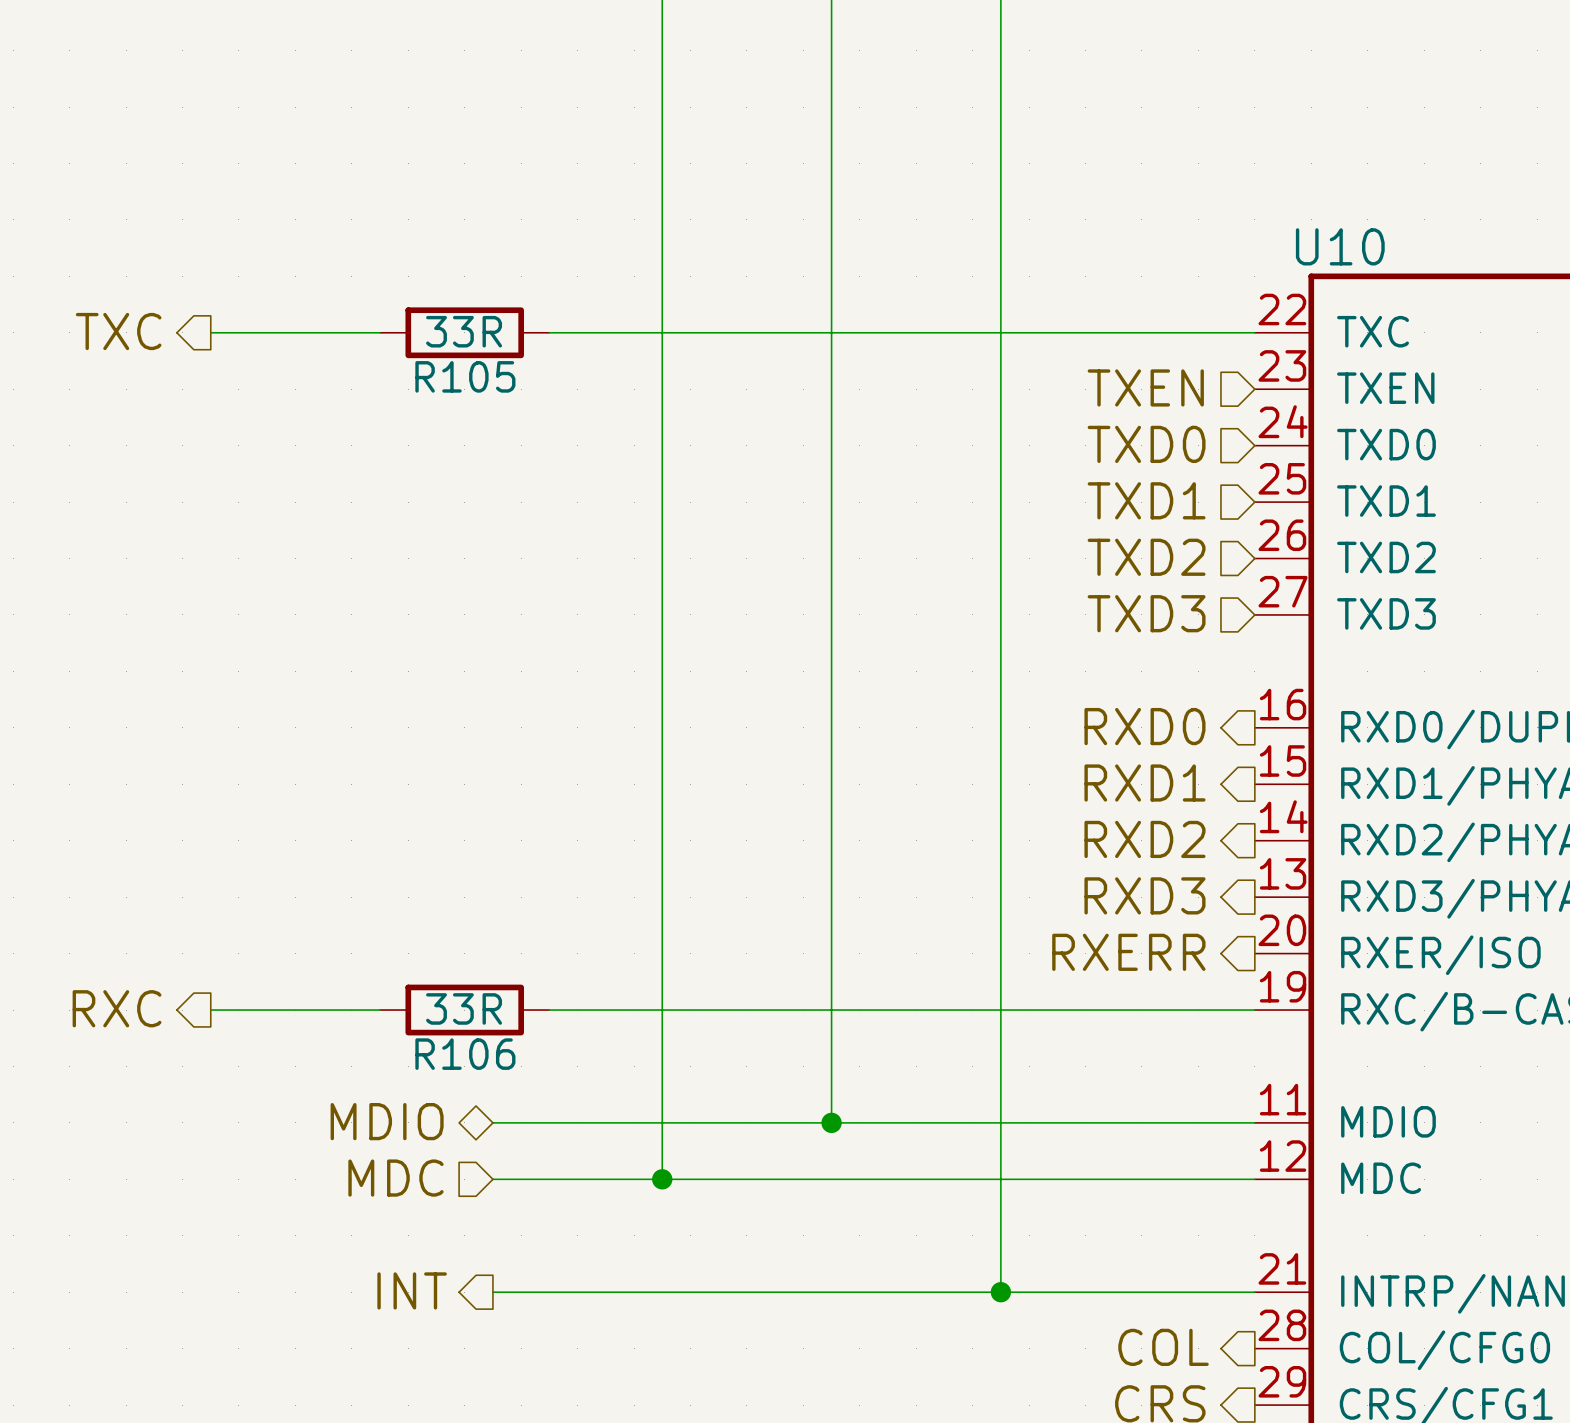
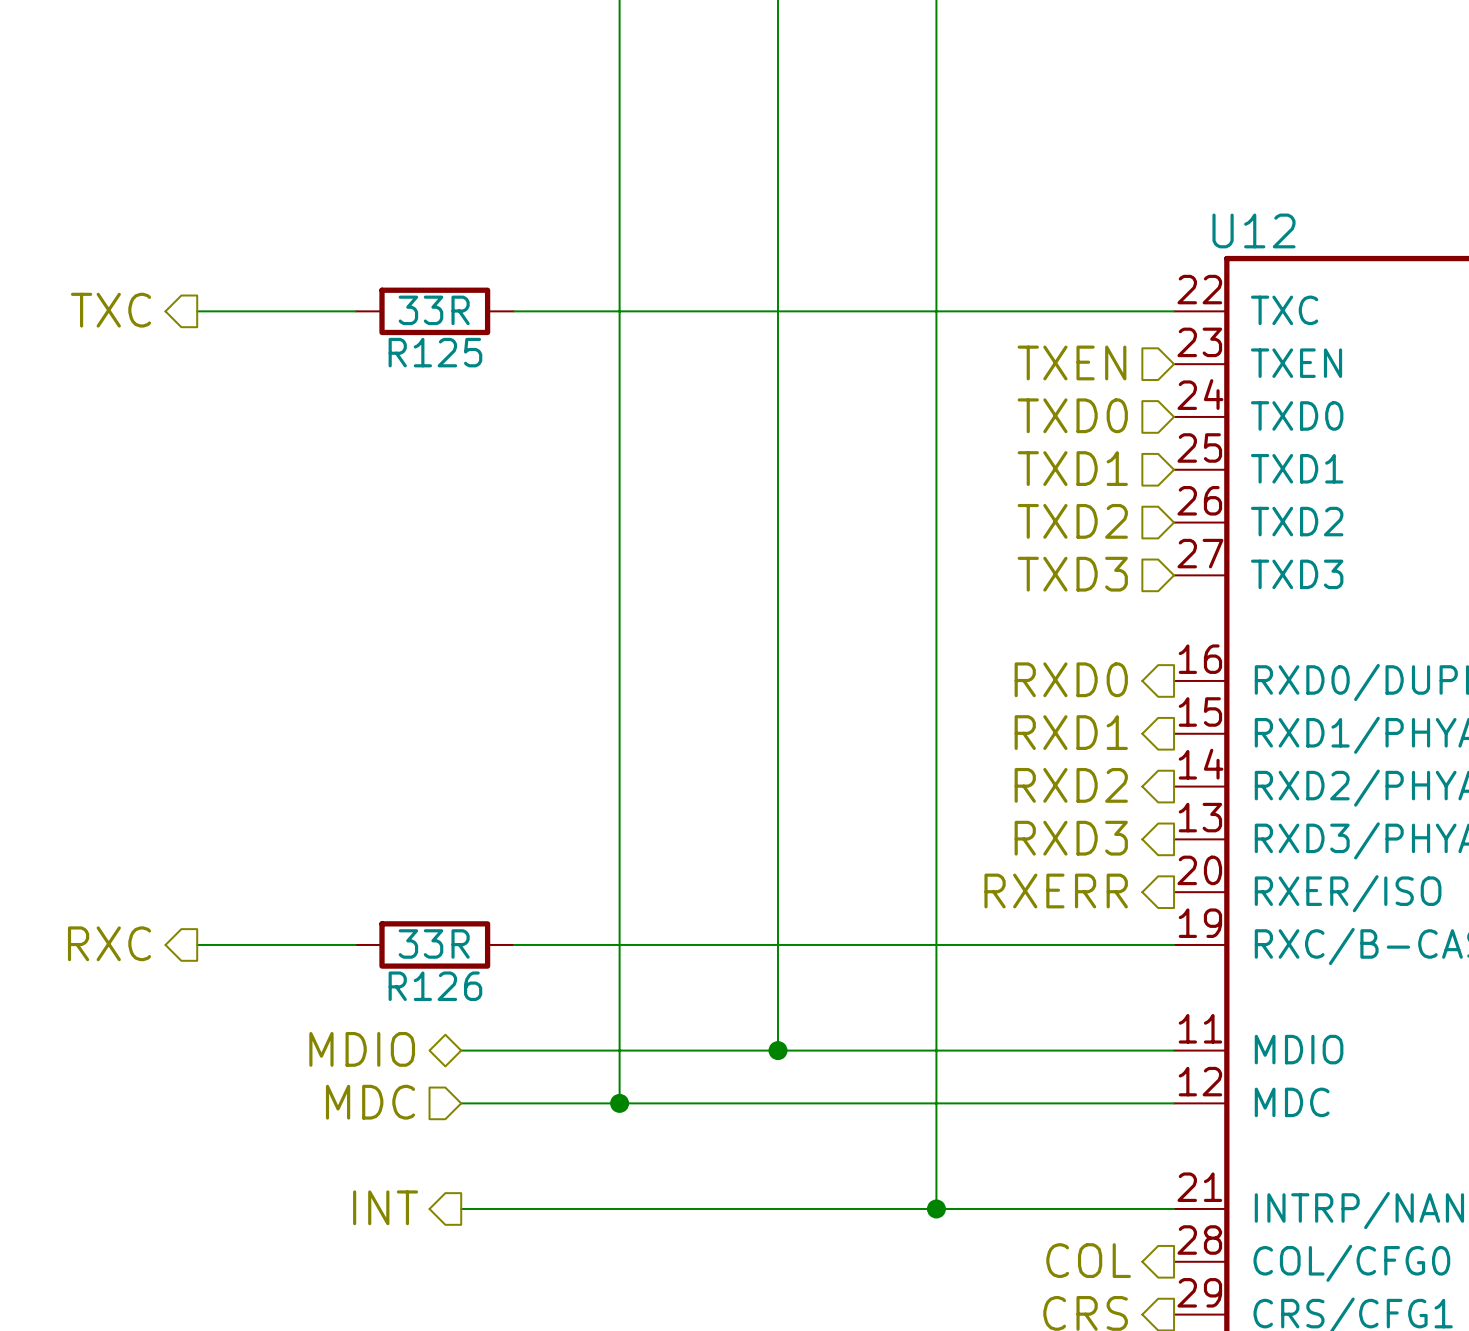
U10 name: U10 (1340, 246) -> U12 (1253, 230)
R105 name: R105 (465, 376) -> R125 (435, 352)
R106 name: R106 (465, 1054) -> R126 (435, 986)

